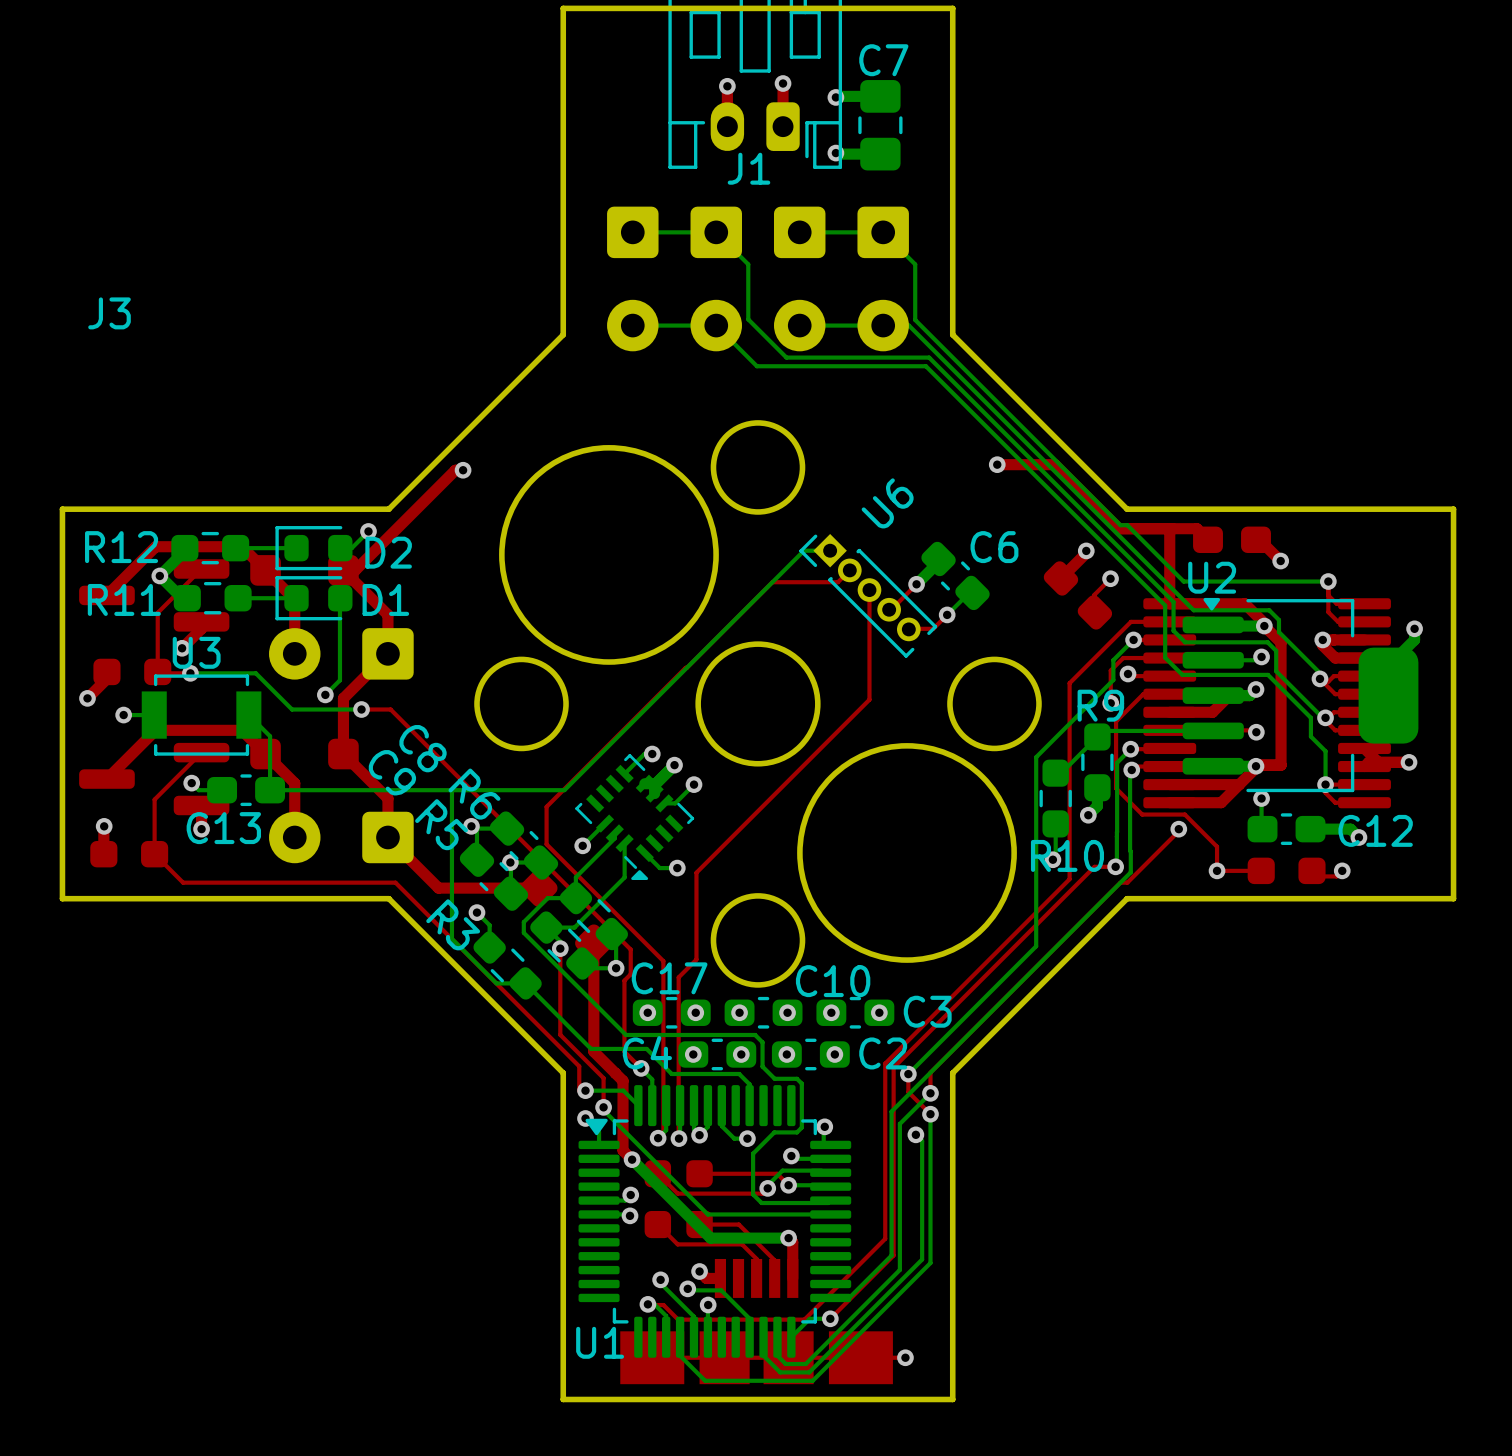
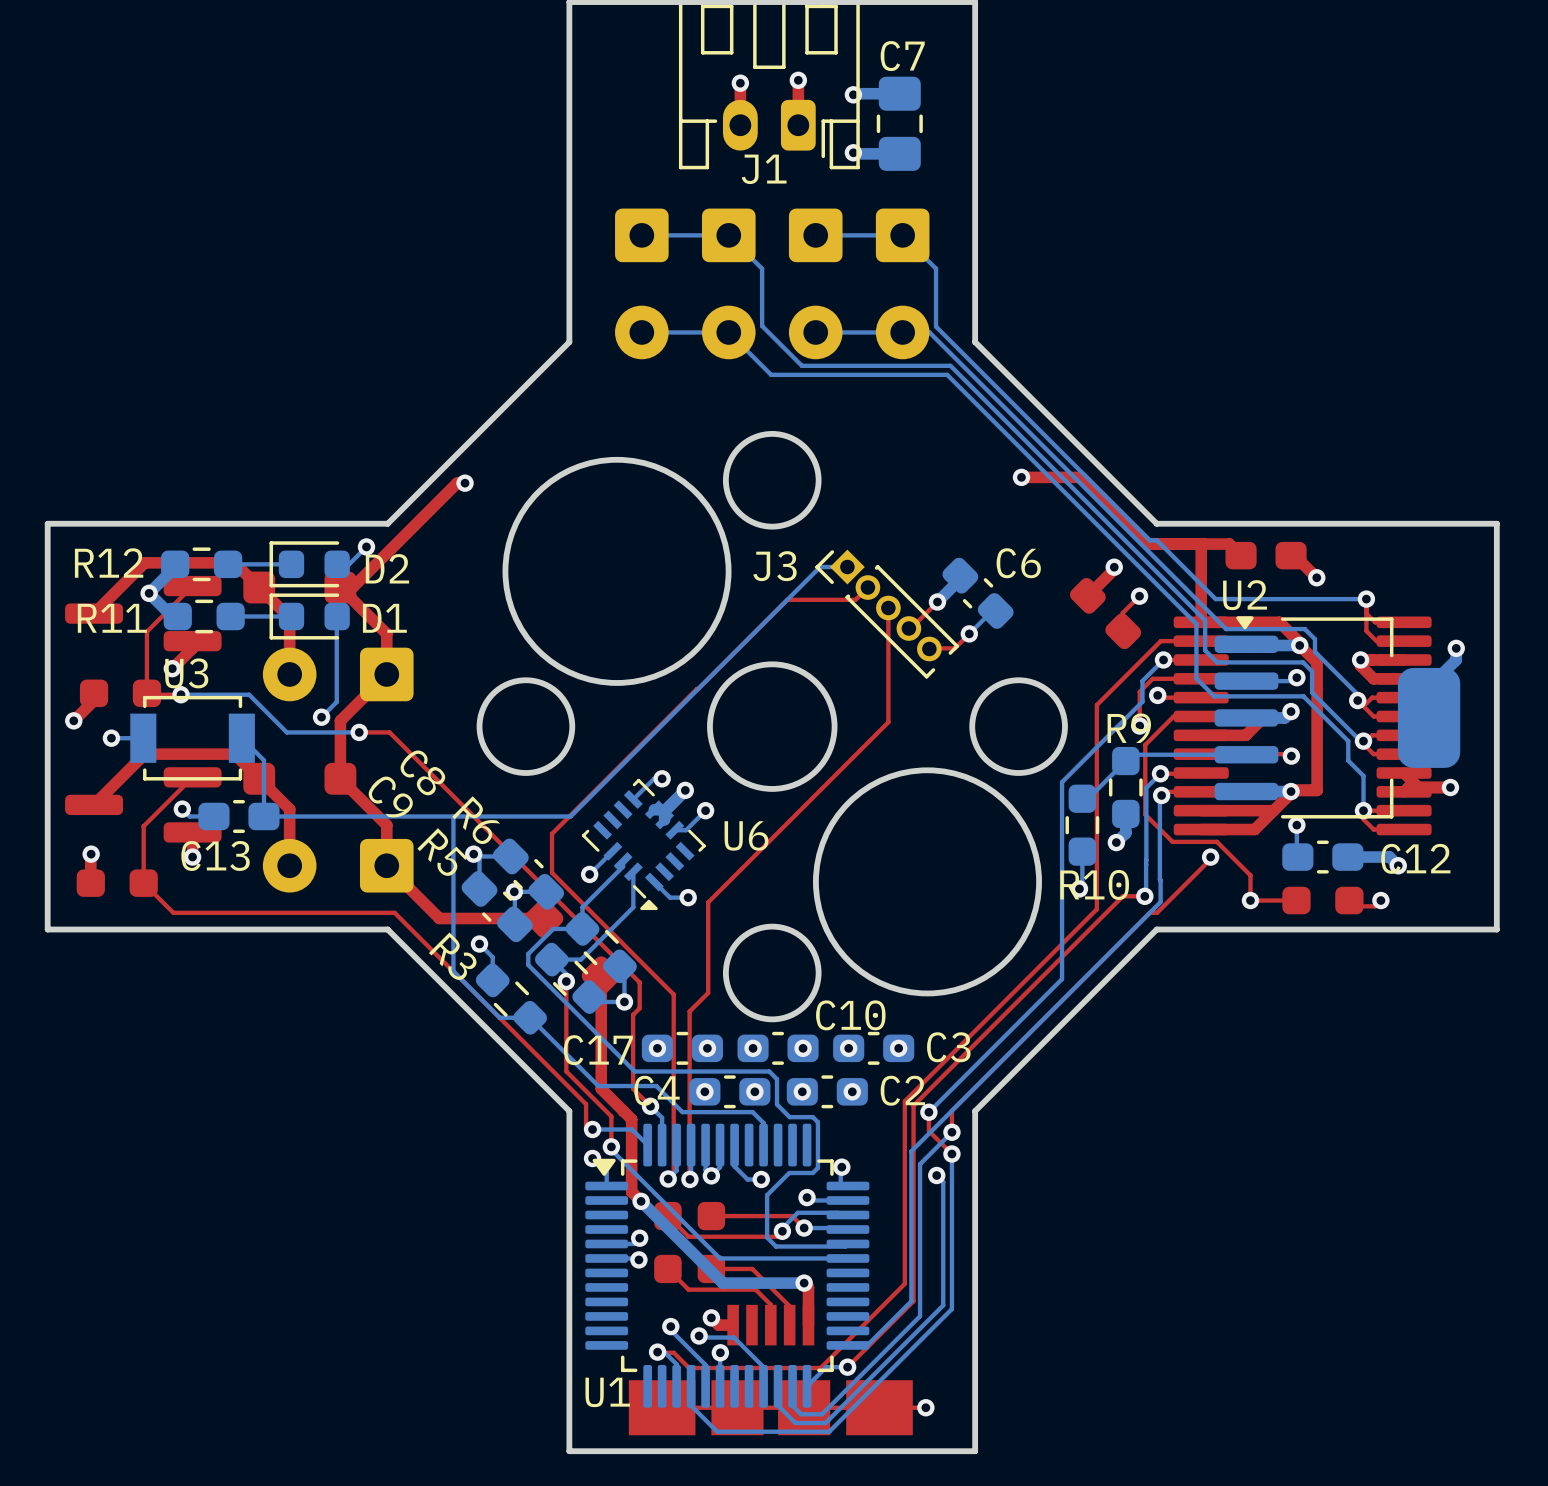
J3 name position: J3 (109, 313) -> J3 (774, 566)
U6 name rotation: 0° (887, 503) -> 45° clockwise (746, 835)
U6 name position: U6 (887, 503) -> U6 (746, 835)
C17 name position: C17 (669, 978) -> C17 (598, 1050)

